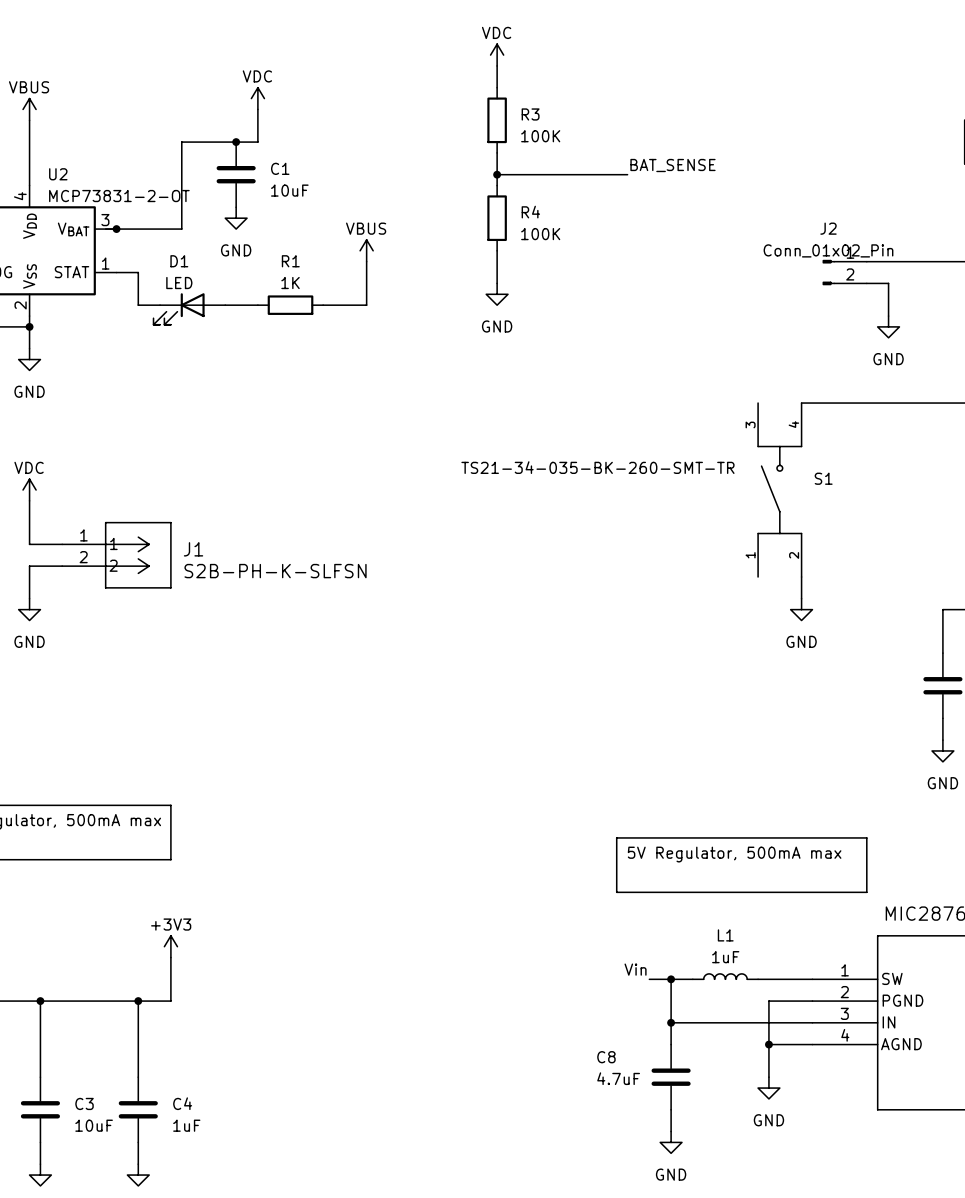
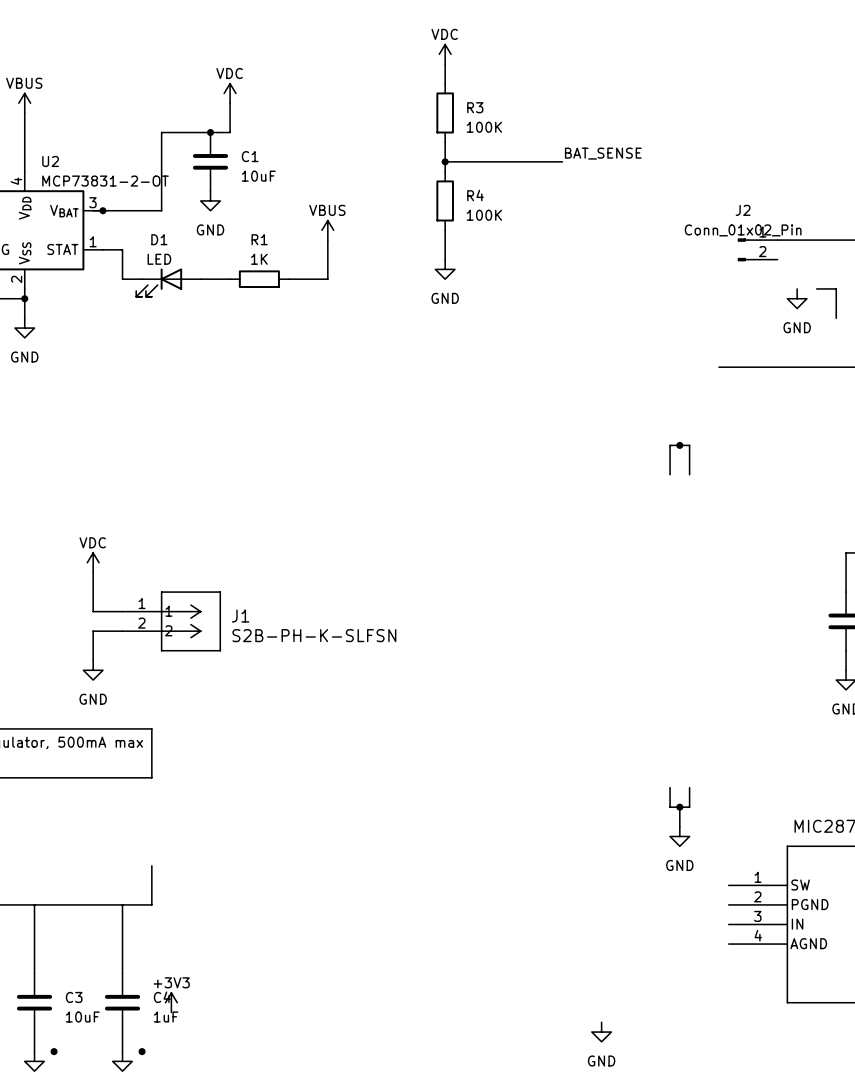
wire: (866, 283) (888, 283) (888, 316) -> (816, 288) (836, 288) (836, 318)
power symbol position: VDC (29, 490) -> VDC (93, 562)
junction: none -> (679, 445)
S1: TS21-34-035-BK-260-SMT-TR (779, 490) -> none
wire: (29, 500) (29, 544) (62, 544) -> (93, 572) (93, 611) (122, 611)
wire: none -> (670, 474) (670, 445) (689, 445) (689, 474)
J1 position: (116, 555) -> (171, 621)
wire: (62, 566) (29, 566) (29, 598) -> (122, 631) (93, 631) (93, 660)
wire: (801, 577) (801, 598) -> none
power symbol position: GND (29, 609) -> GND (93, 670)
power symbol: GND (801, 609) -> none
line: (616, 837) (866, 837) (866, 892) (616, 892) (616, 837) -> none
text: 5V Regulator, 500mA max (734, 854) -> none
wire: none -> (670, 787) (670, 807) (689, 807) (689, 787)
wire: none -> (679, 807) (679, 826)
junction: none -> (679, 807)
power symbol: none -> GND (679, 836)
power symbol position: +3V3 (170, 946) -> +3V3 (171, 1002)
label: Vin (635, 969) -> none
L1: 1uF (725, 976) -> none
wire: (649, 979) (692, 979) -> none
wire: (671, 979) (671, 1044) -> none
junction: (671, 979) -> none
wire: (758, 979) (812, 979) -> none
junction: (40, 1001) -> none
junction: (138, 1001) -> none
wire: (812, 1001) (768, 1001) (768, 1077) -> none
wire: (671, 1022) (812, 1022) -> none
junction: (671, 1022) -> none
wire: (768, 1044) (812, 1044) -> none
junction: (768, 1044) -> none
C8: 4.7uF (671, 1077) -> none
power symbol: GND (768, 1088) -> none
wire: (671, 1109) (671, 1131) -> none
junction: none -> (54, 1051)
junction: none -> (142, 1051)

